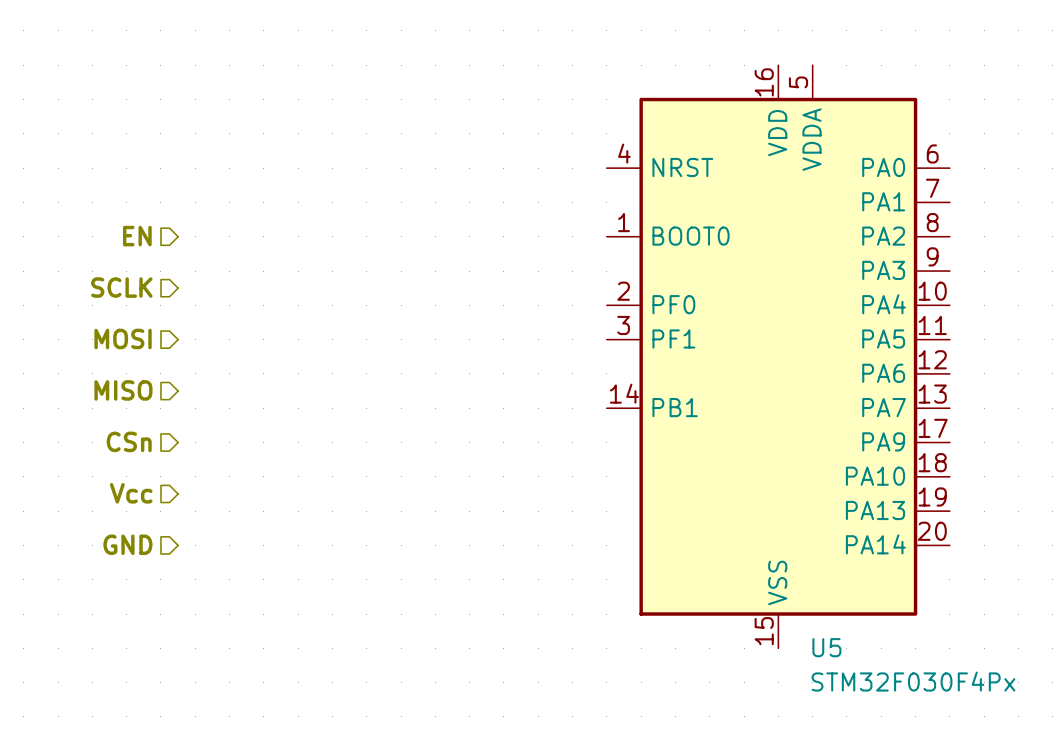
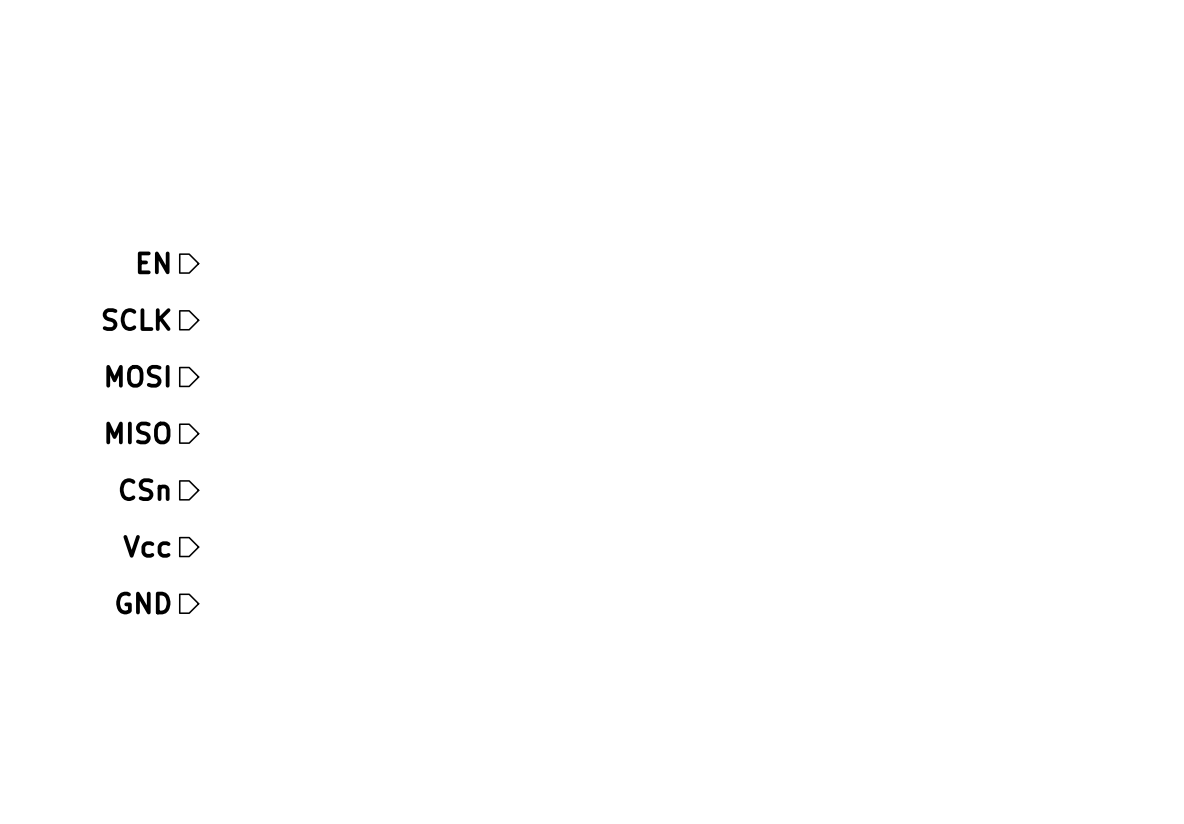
U5: STM32F030F4Px (778, 356) -> none

